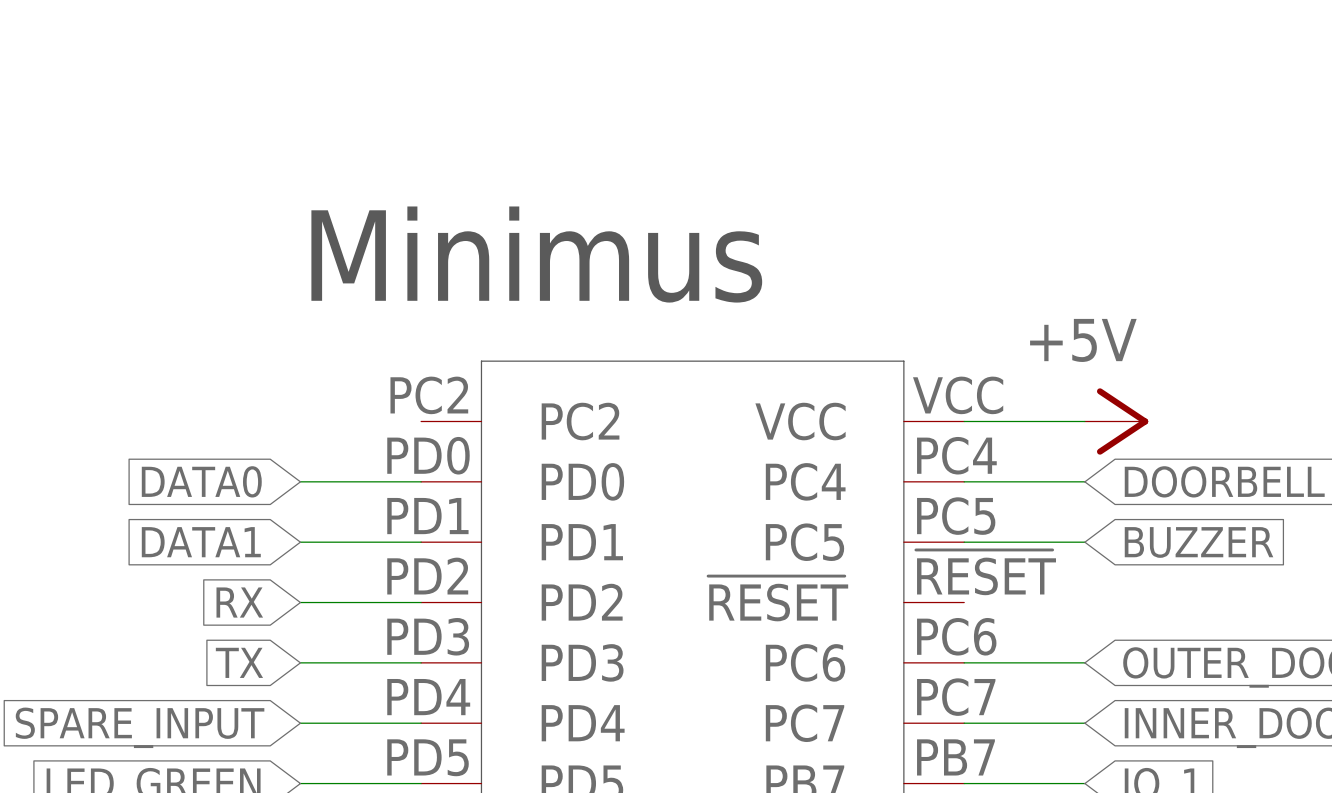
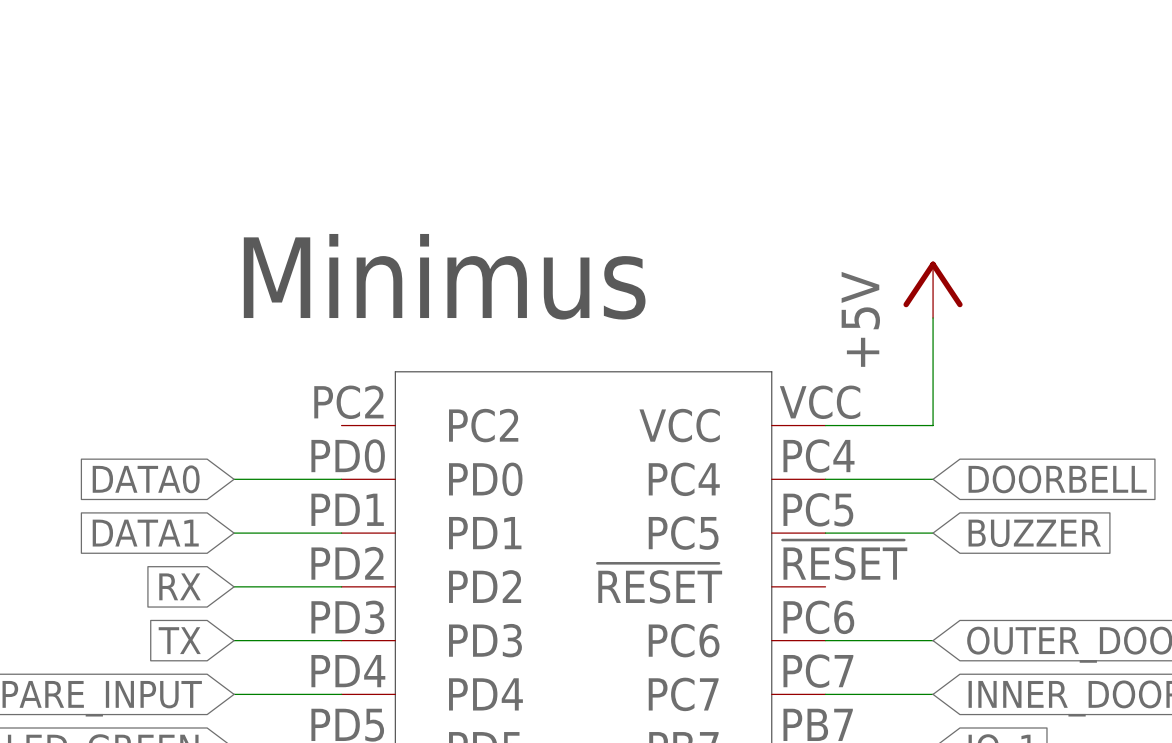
wire: none -> (933, 318) (933, 425)
power symbol position: +5V (1116, 421) -> +5V (933, 289)
power symbol rotation: 0° (1122, 421) -> 90° counterclockwise (933, 284)

